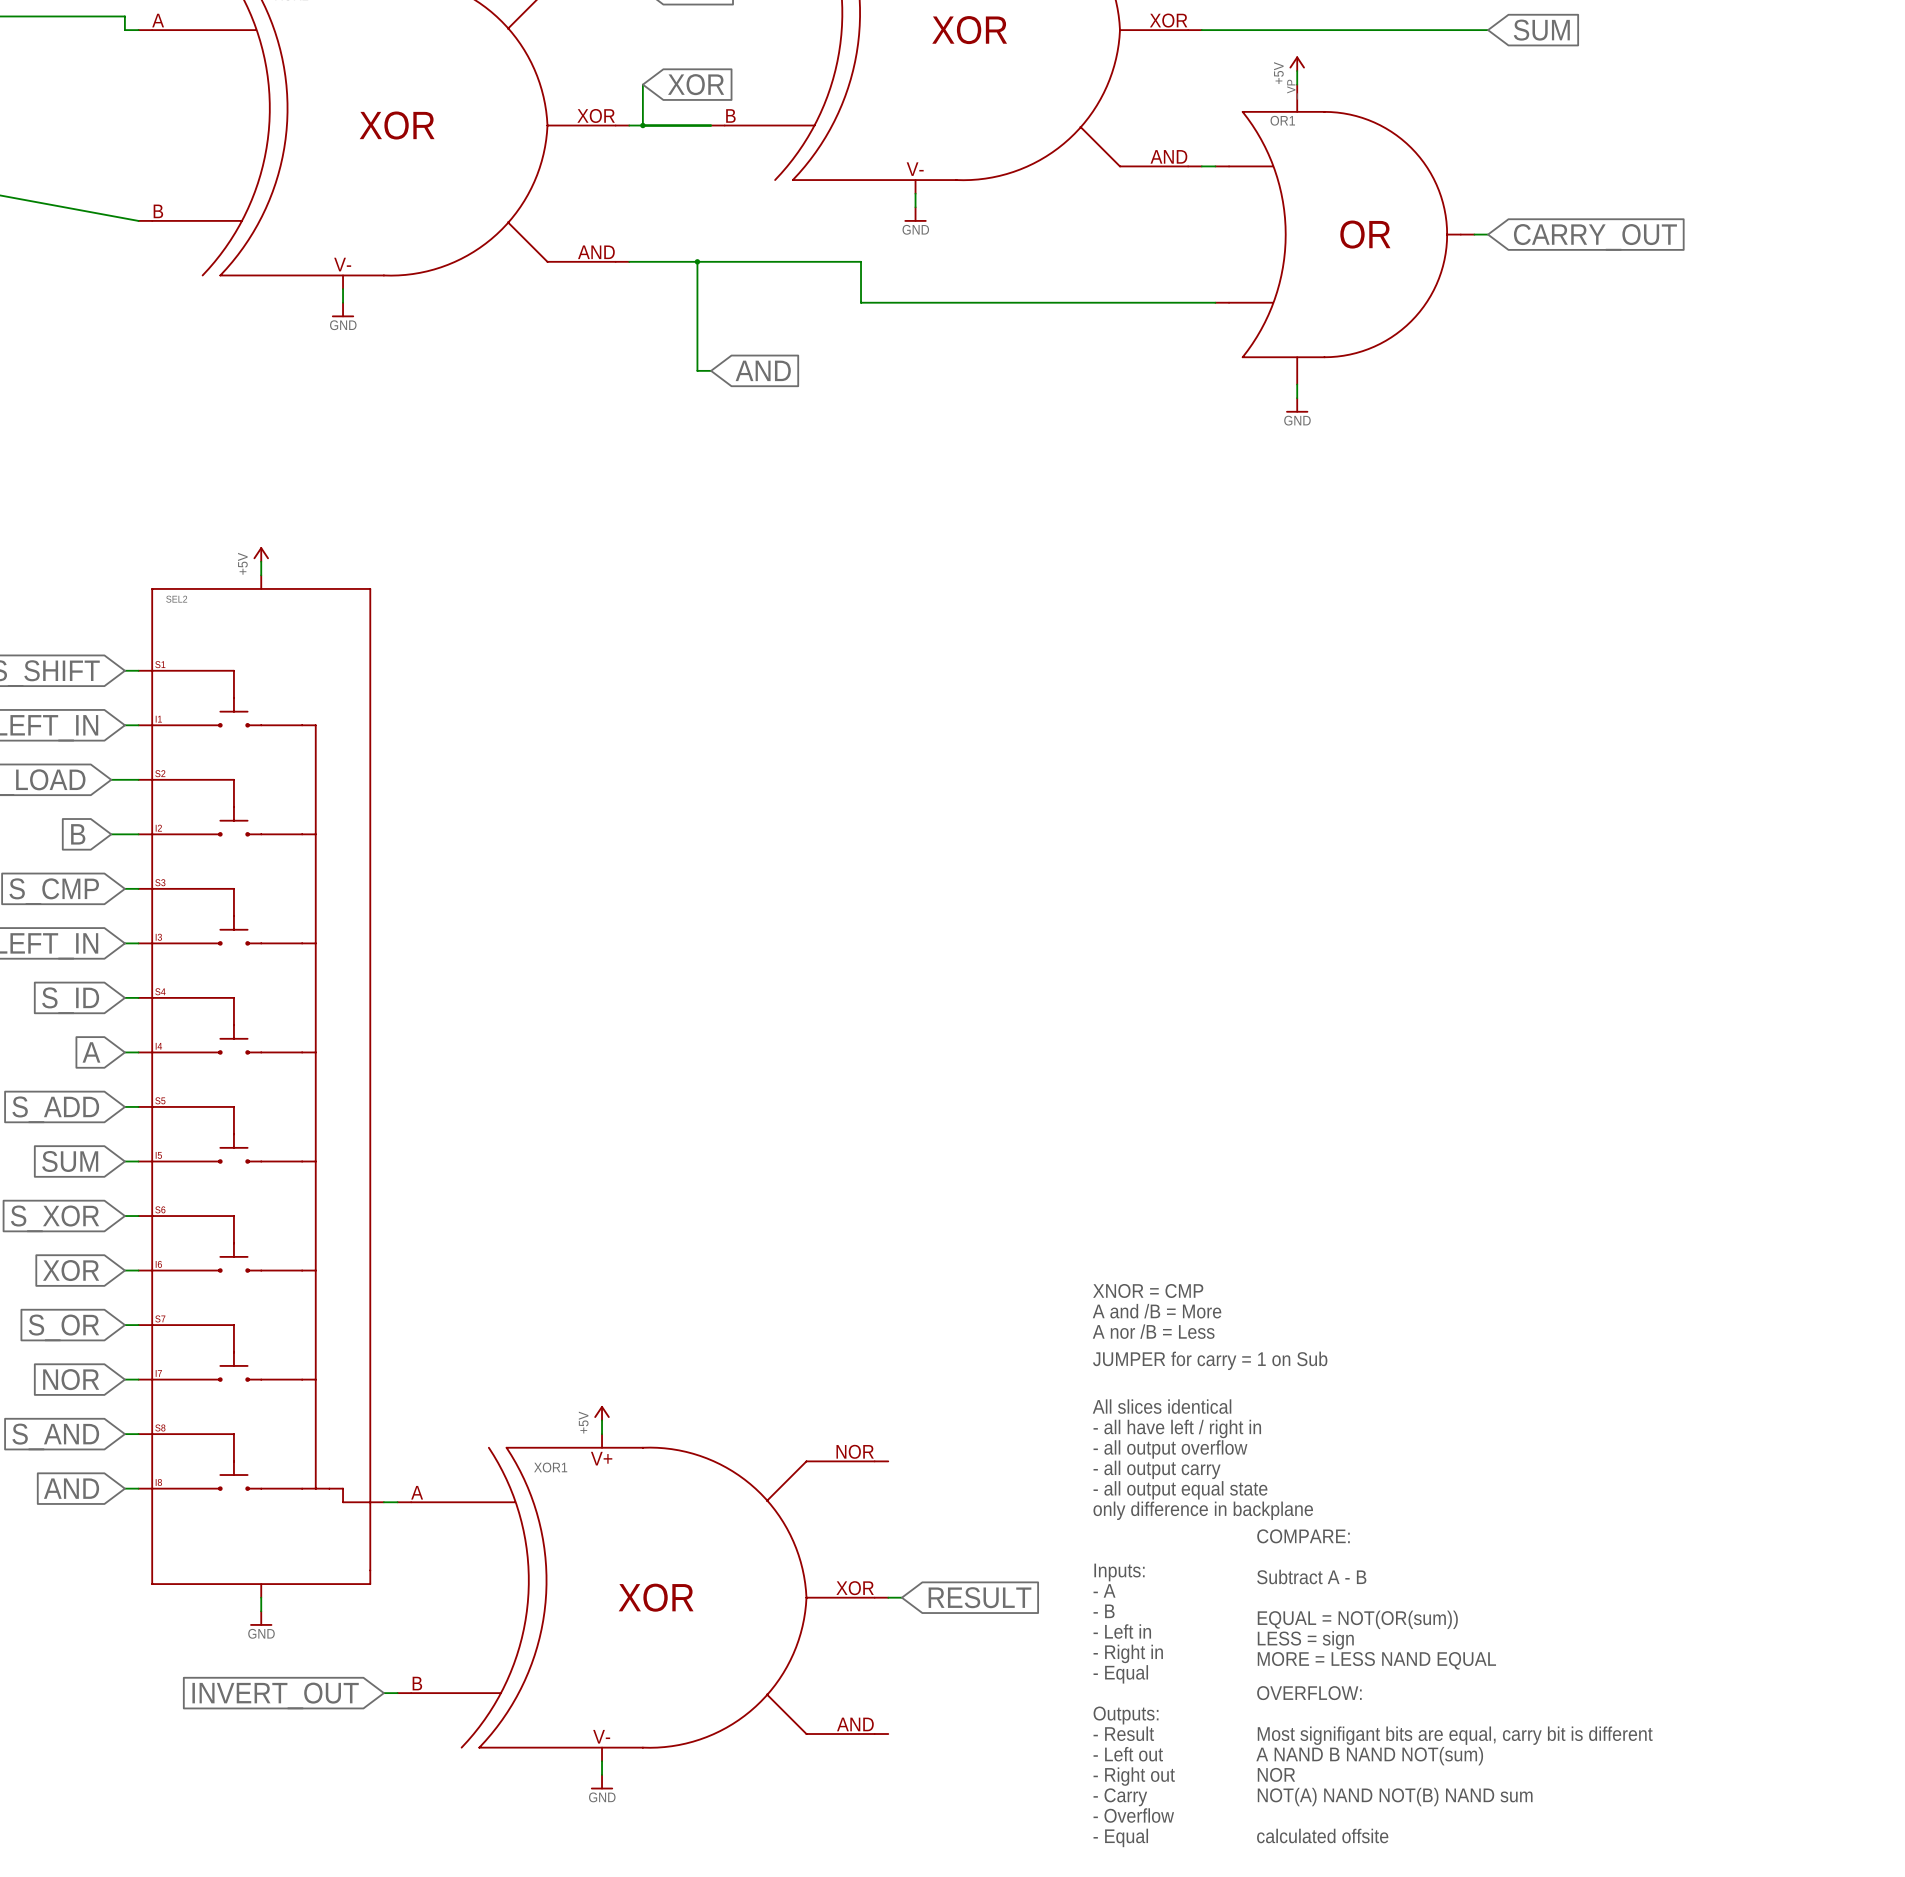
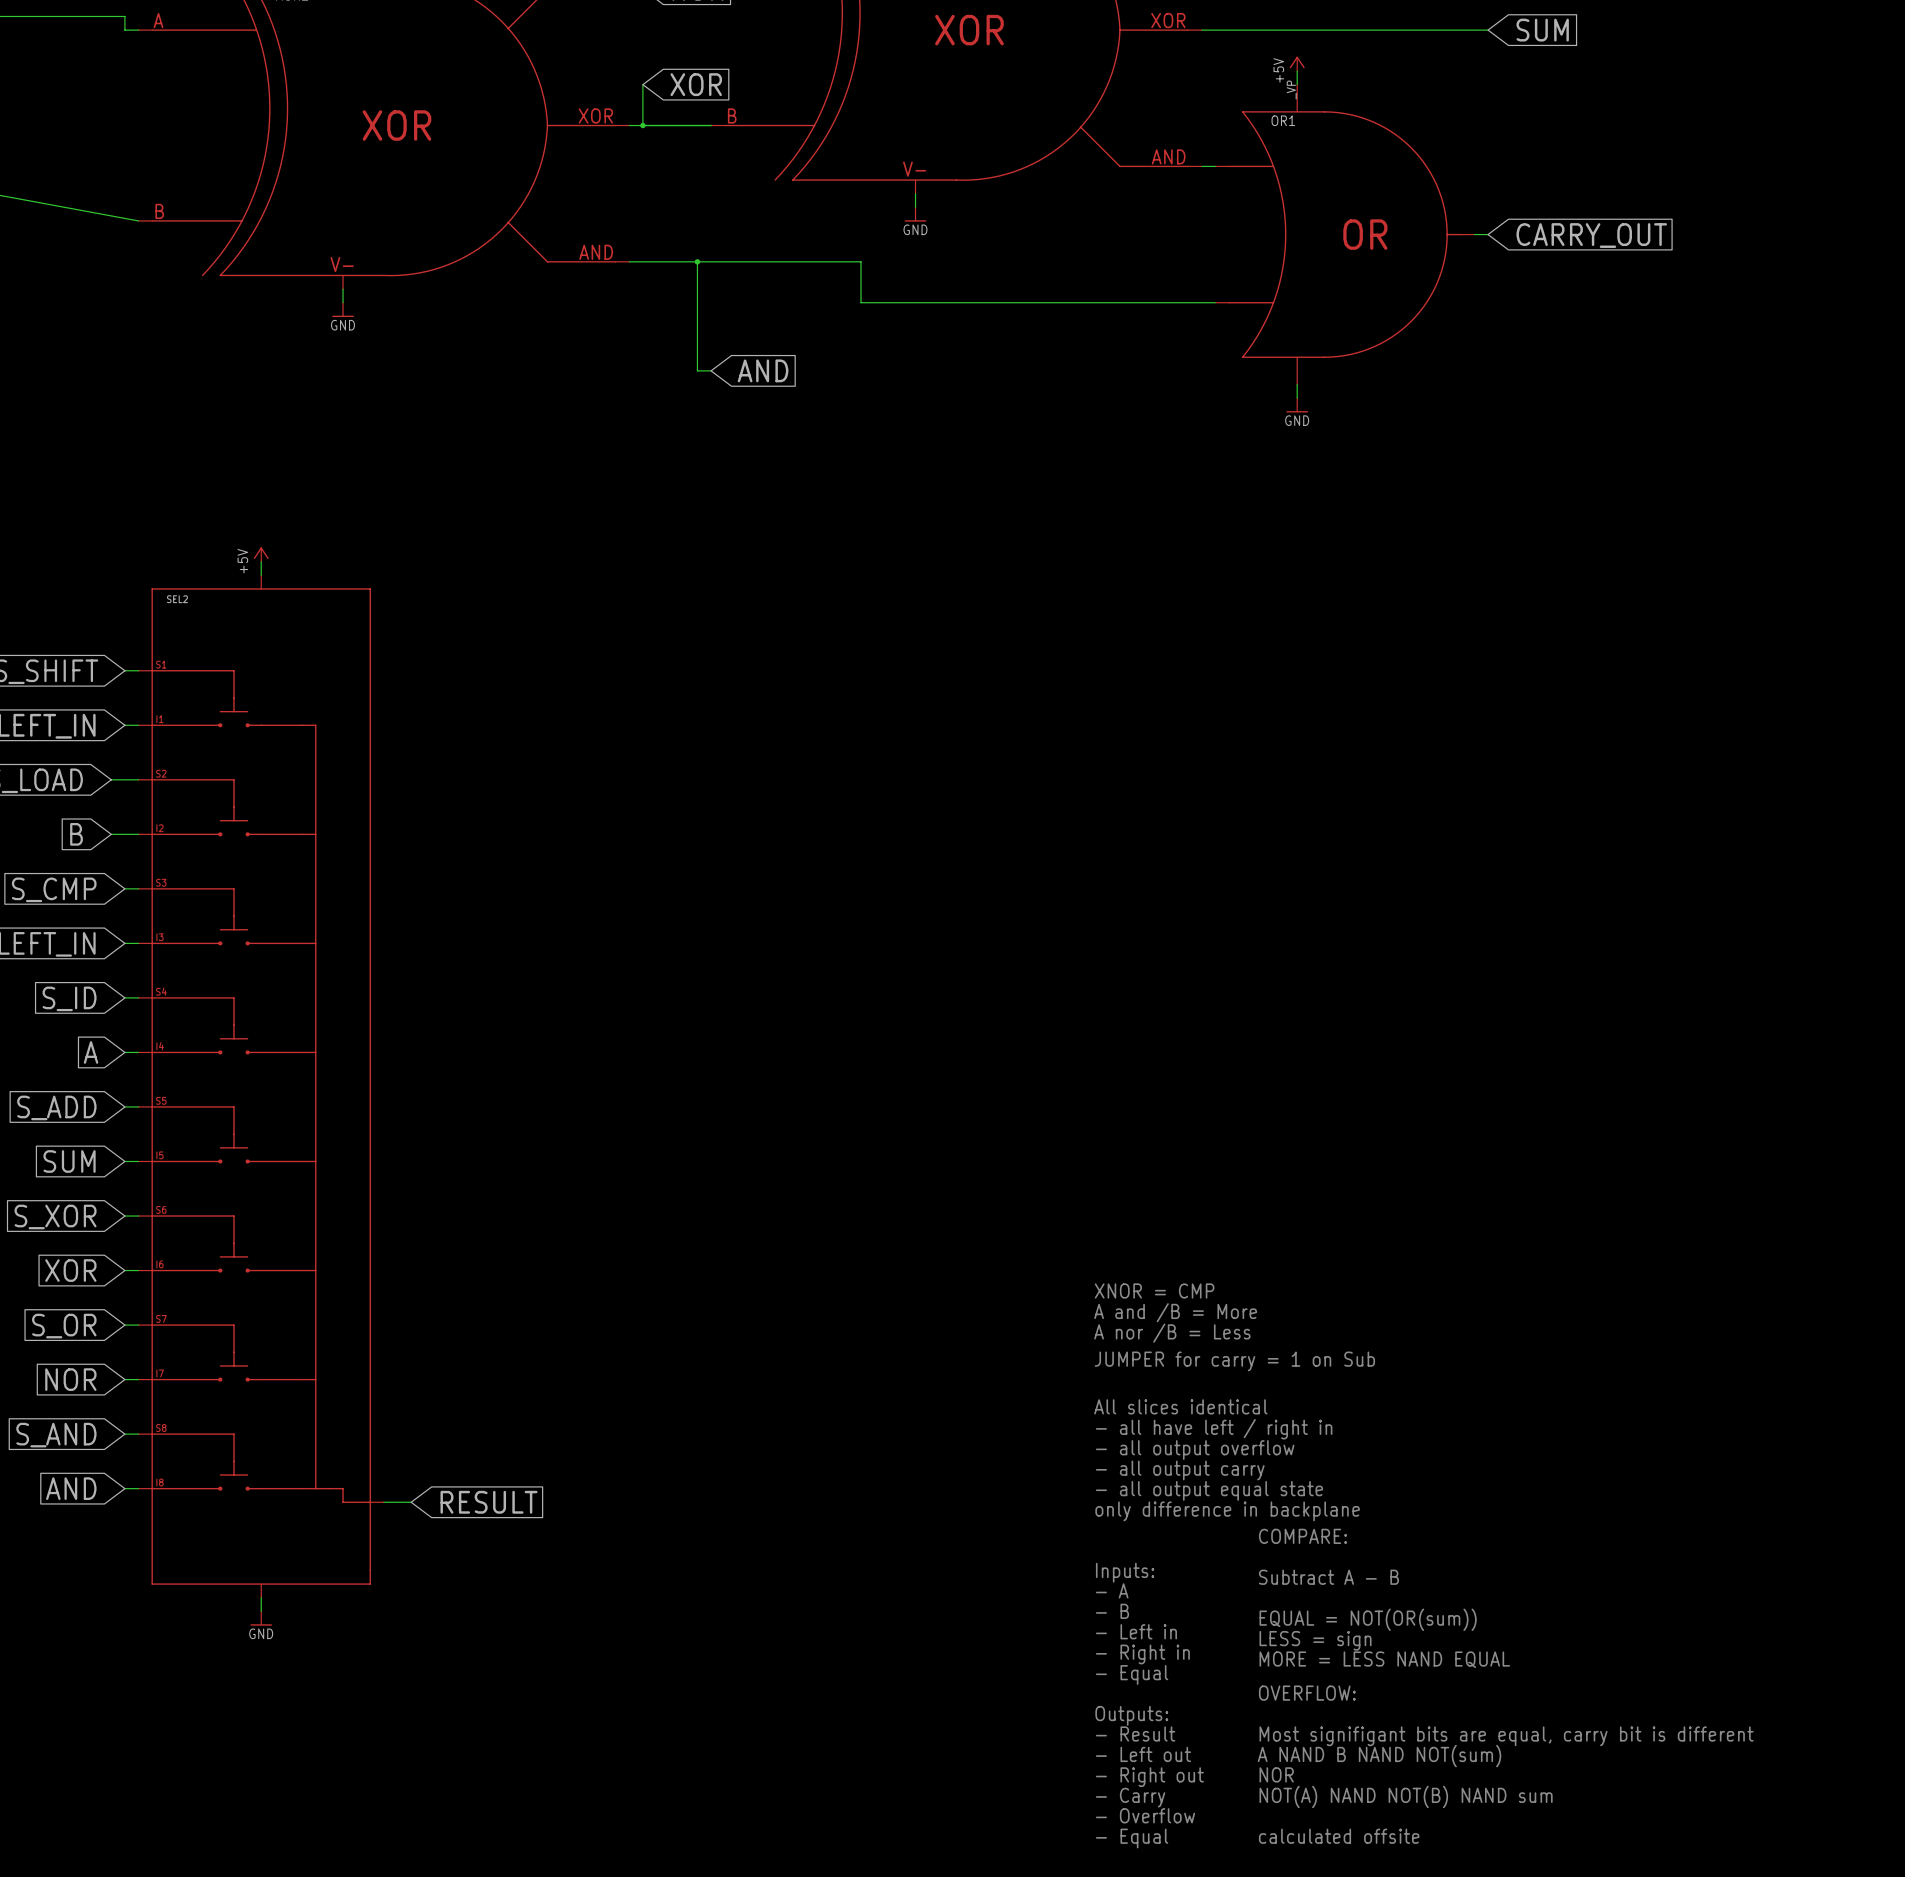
power symbol: +5V (602, 1413) -> none
wire: (602, 1420) (602, 1434) -> none
global label: none -> RESULT (489, 1502)
XOR1: (642, 1597) -> none
wire: (888, 1597) (901, 1597) -> none
global label: RESULT (979, 1597) -> none
wire: (383, 1693) (397, 1693) -> none
global label: INVERT_OUT (275, 1695) -> none
wire: (602, 1761) (602, 1774) -> none
power symbol: GND (602, 1782) -> none

